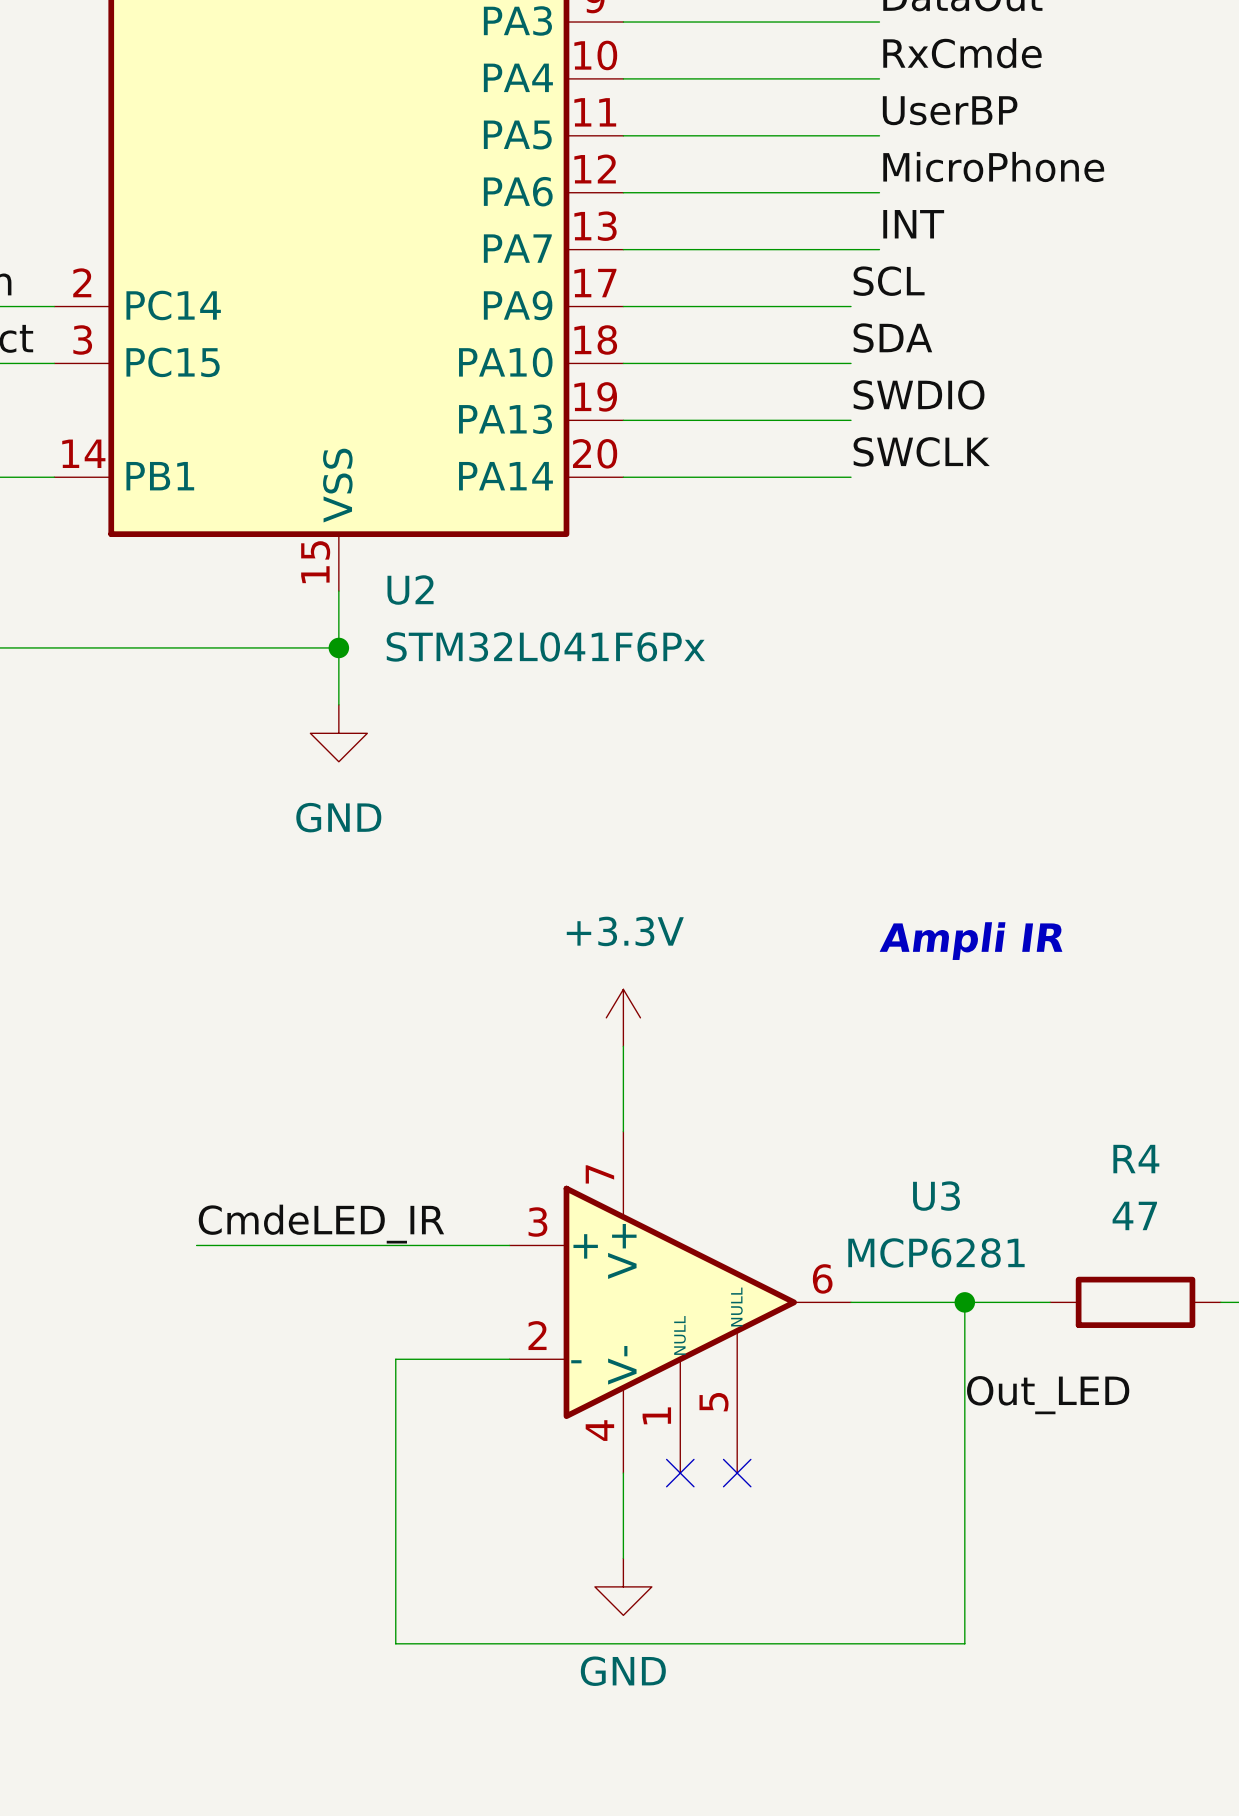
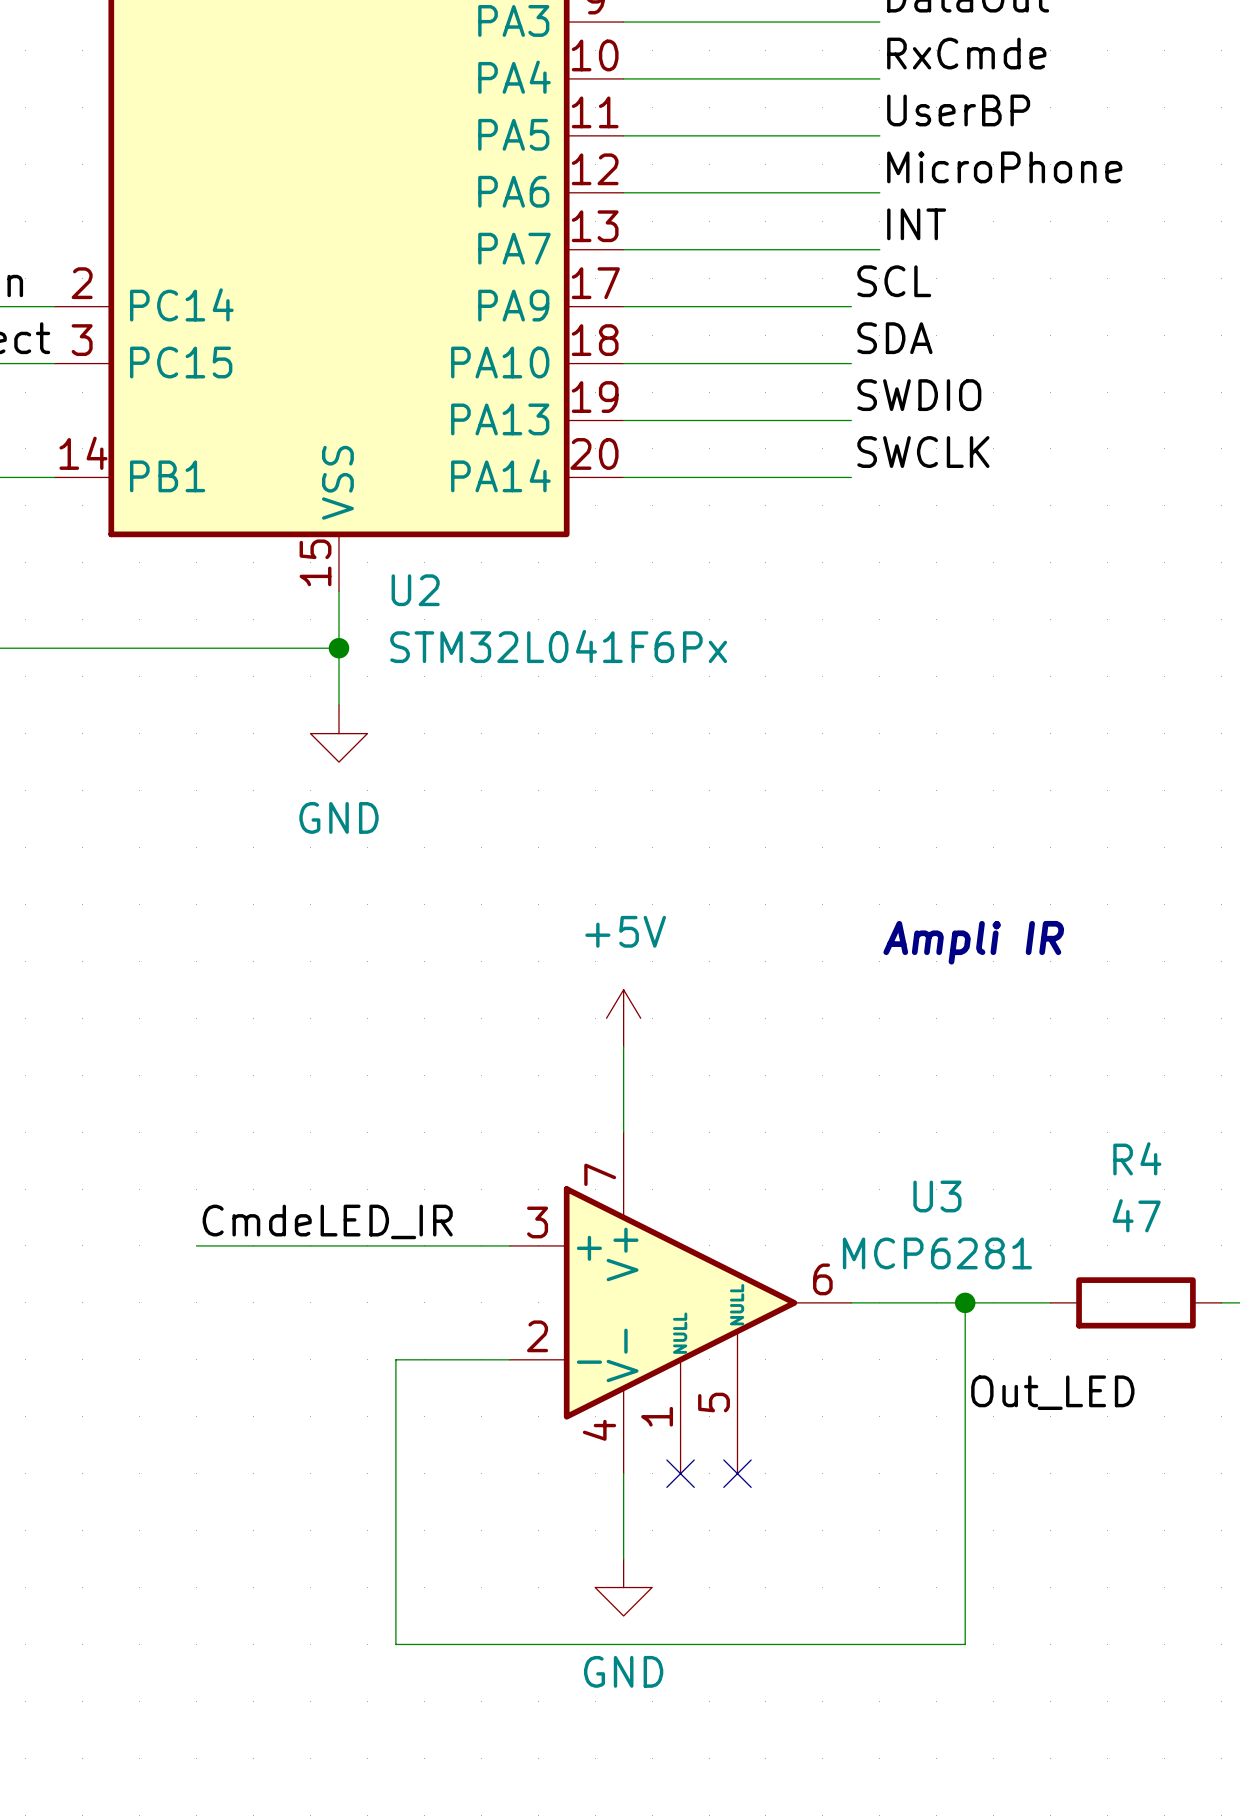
power symbol: +3.3V (623, 1017) -> +5V (623, 1018)

